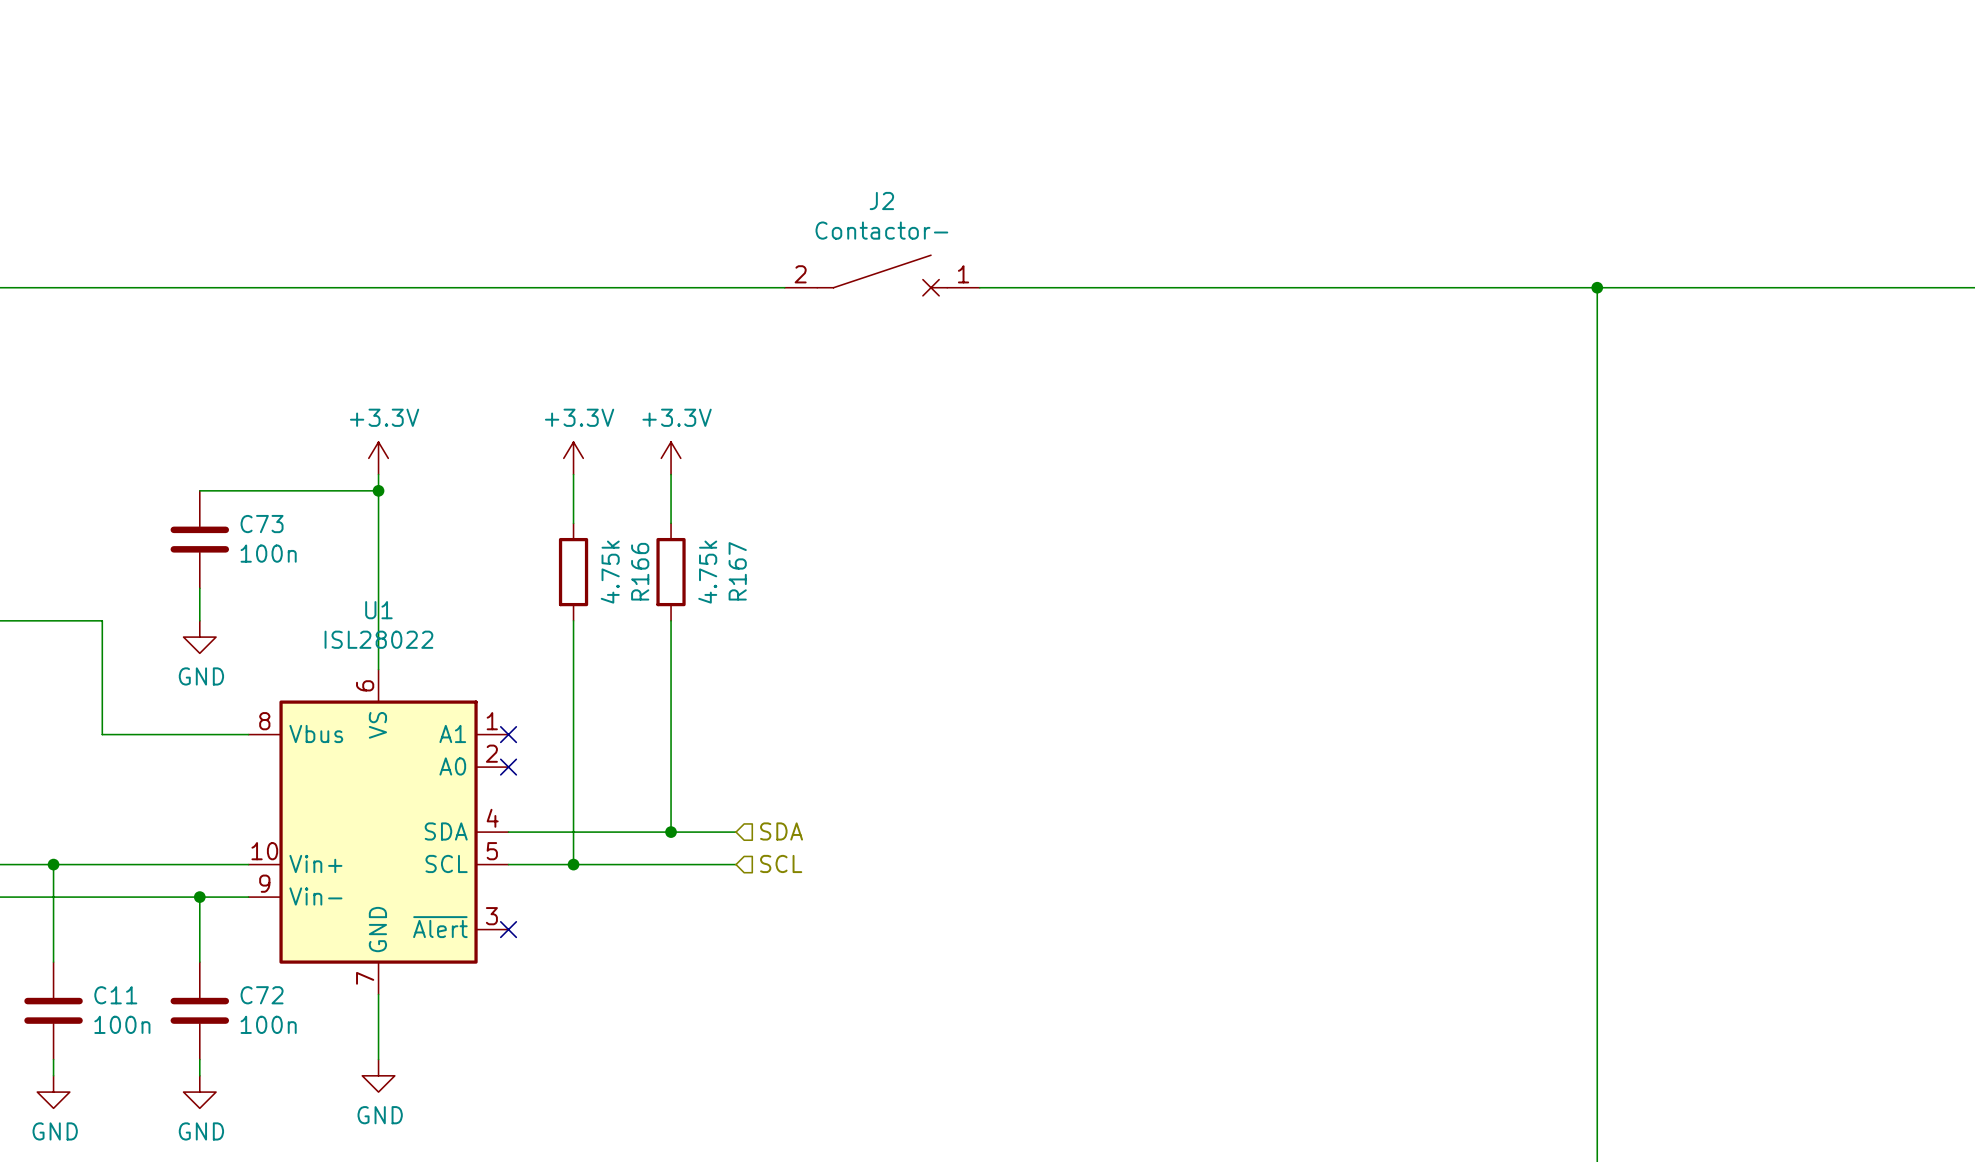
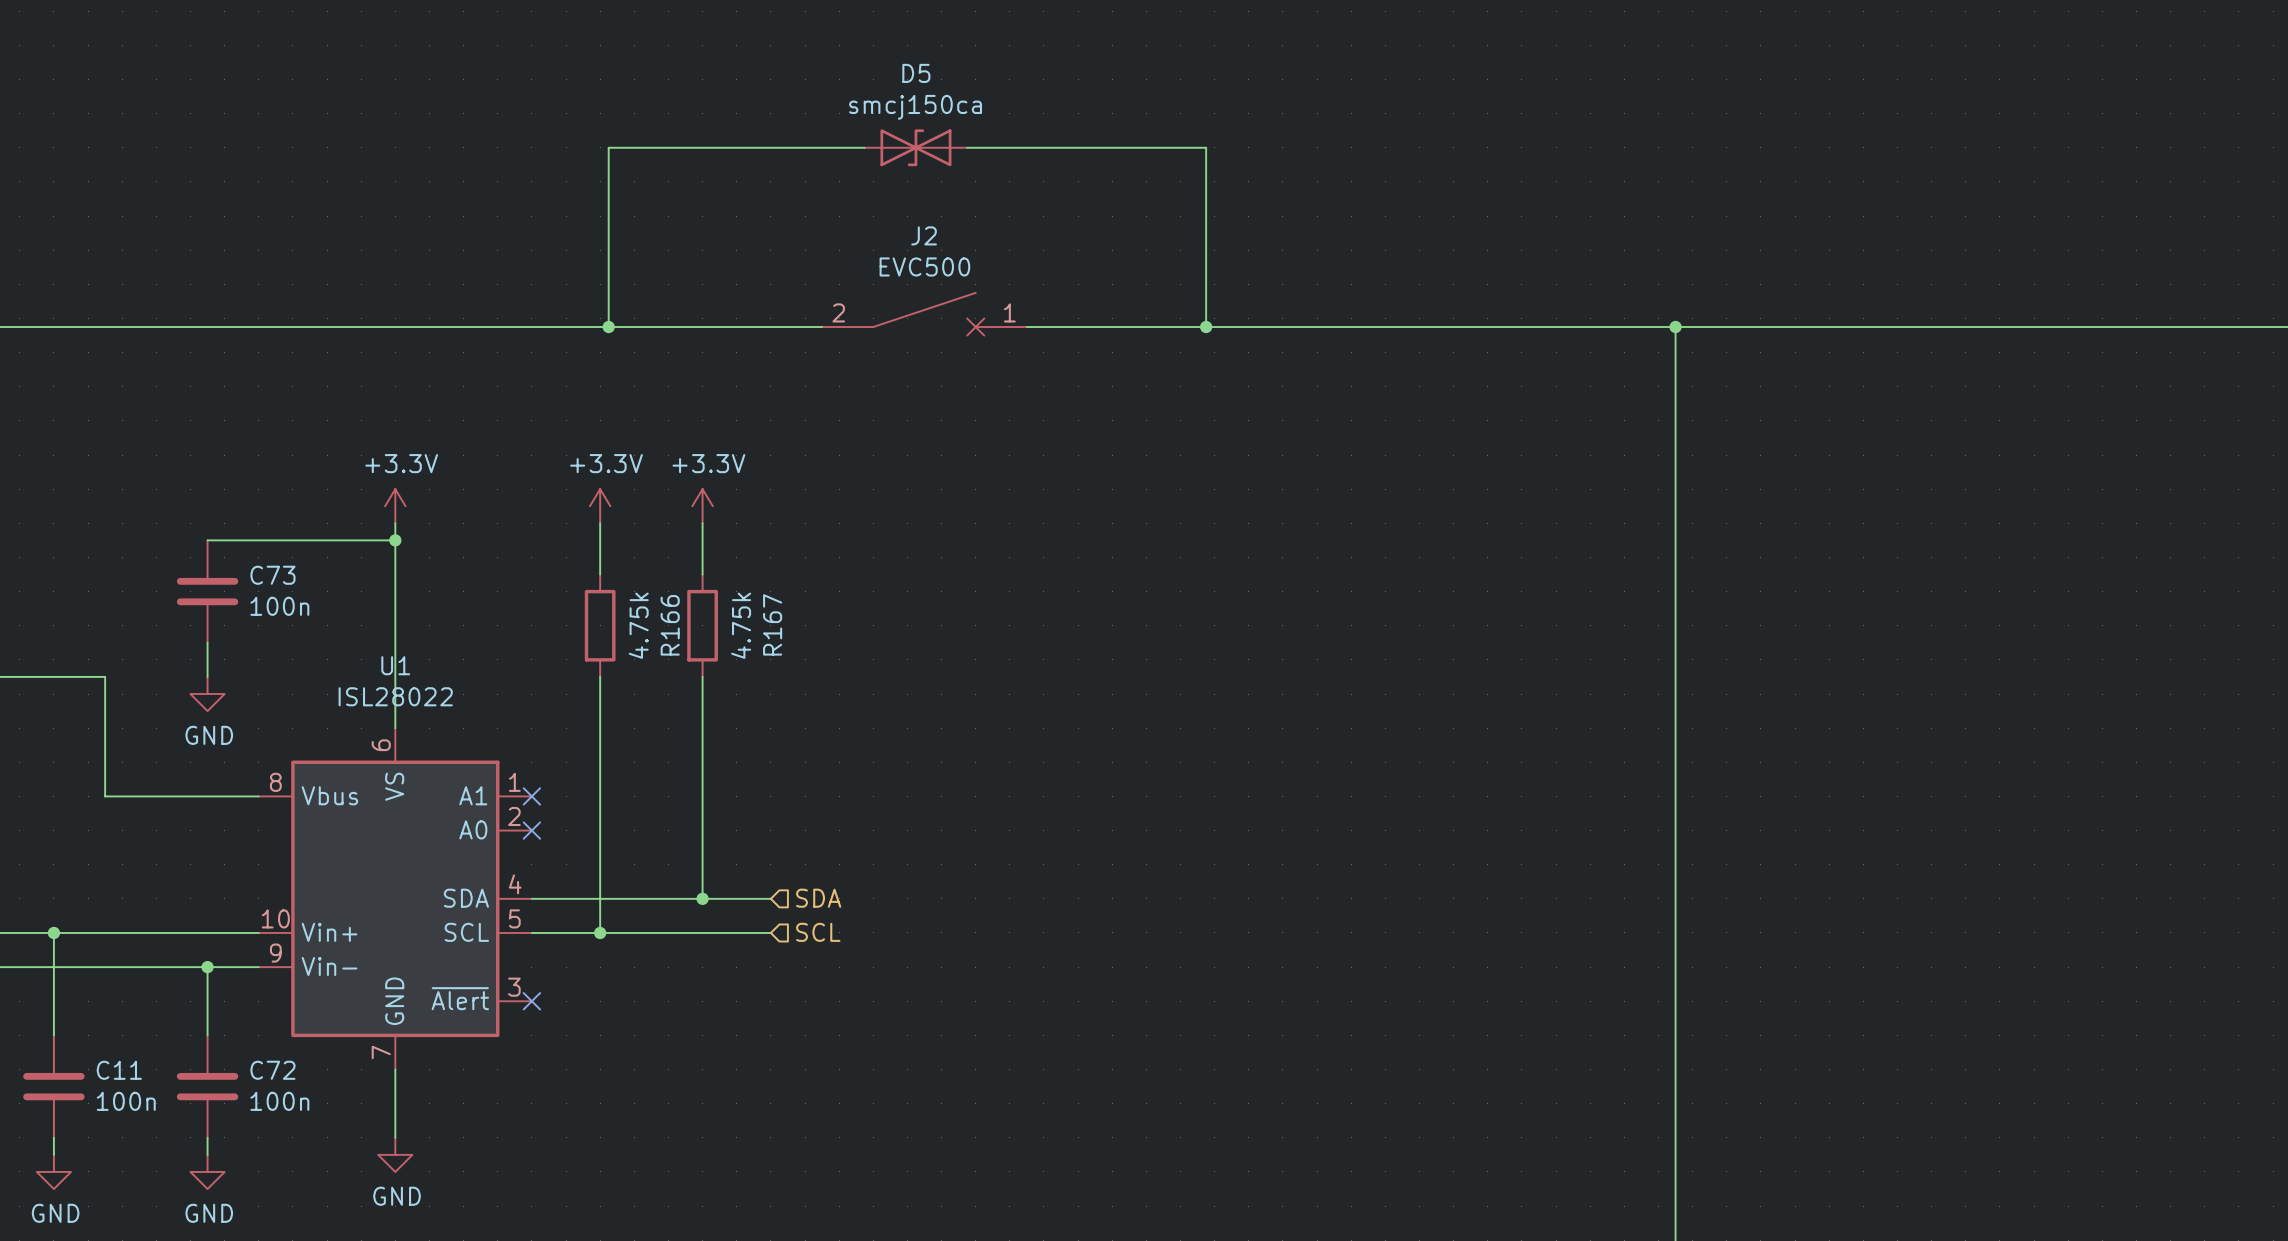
wire: none -> (864, 147) (608, 147) (608, 327)
D5: none -> smcj150ca (915, 147)
wire: none -> (967, 147) (1206, 147) (1206, 327)
J2 value: Contactor- (881, 230) -> EVC500 (924, 266)
junction: none -> (608, 327)
junction: none -> (1206, 327)

